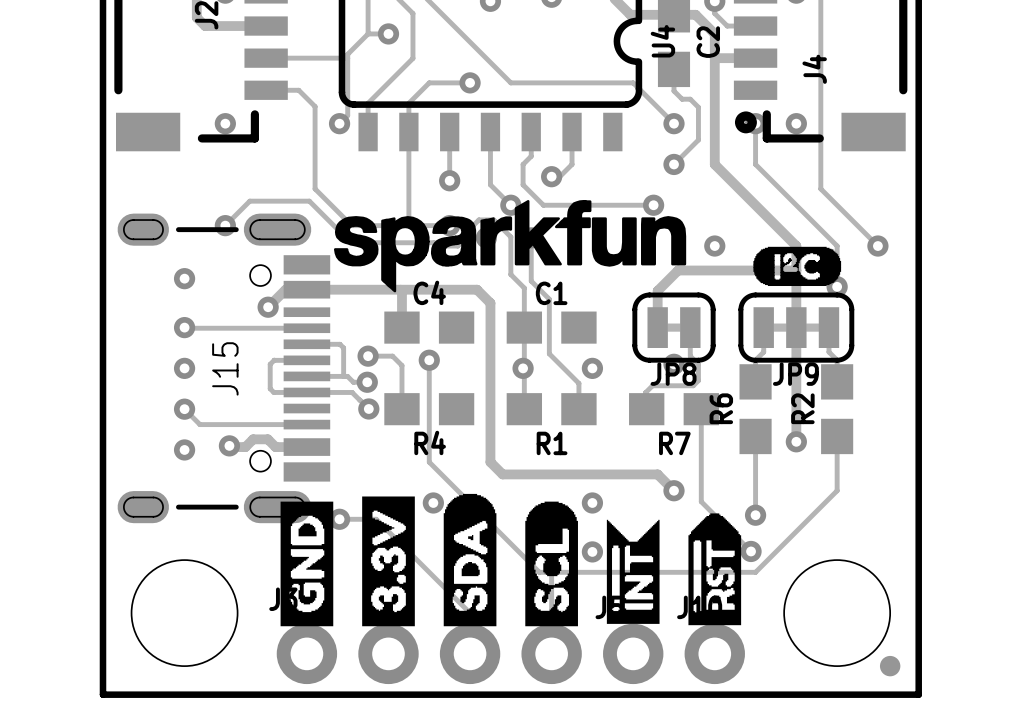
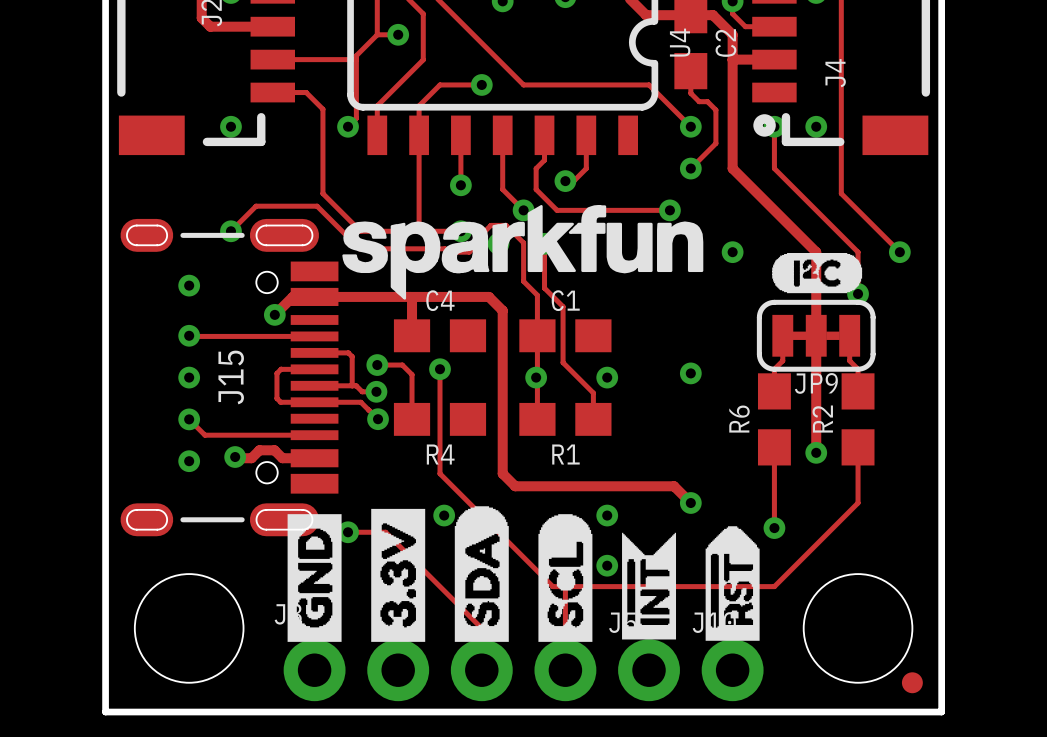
track: (796, 270) (678, 270) (657, 290) (657, 327) -> none
JP8: (673, 327) -> none
track: (690, 327) (690, 356) (698, 364) (698, 380) (693, 385) (652, 385) (645, 392) (646, 409) -> none
R7: (673, 409) -> none
track: (701, 409) (701, 501) (751, 551) -> none
via: (751, 551) -> none

